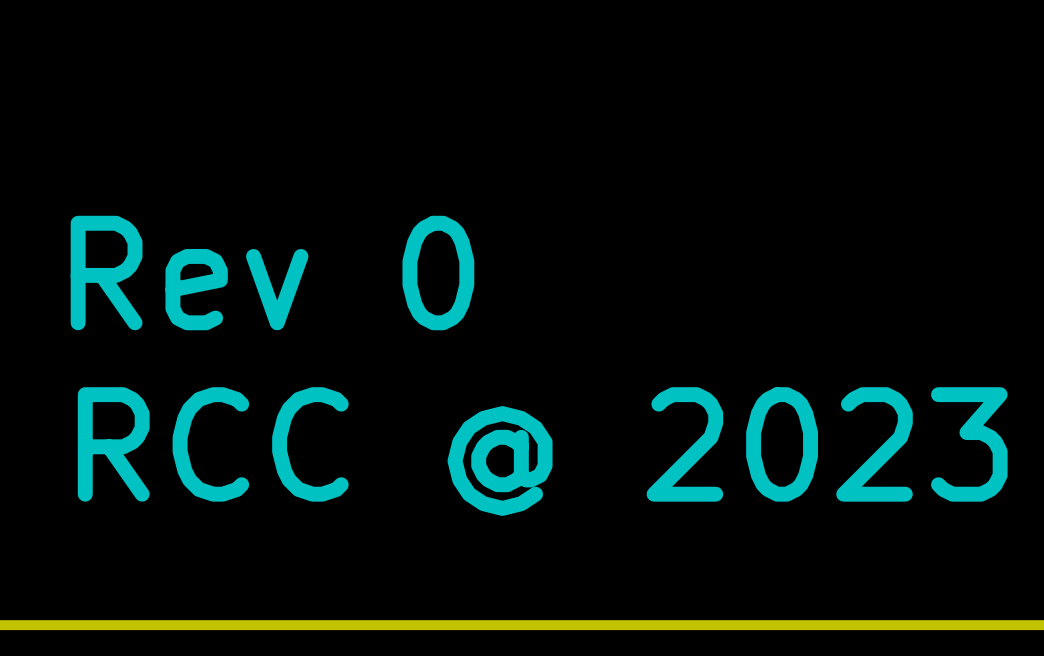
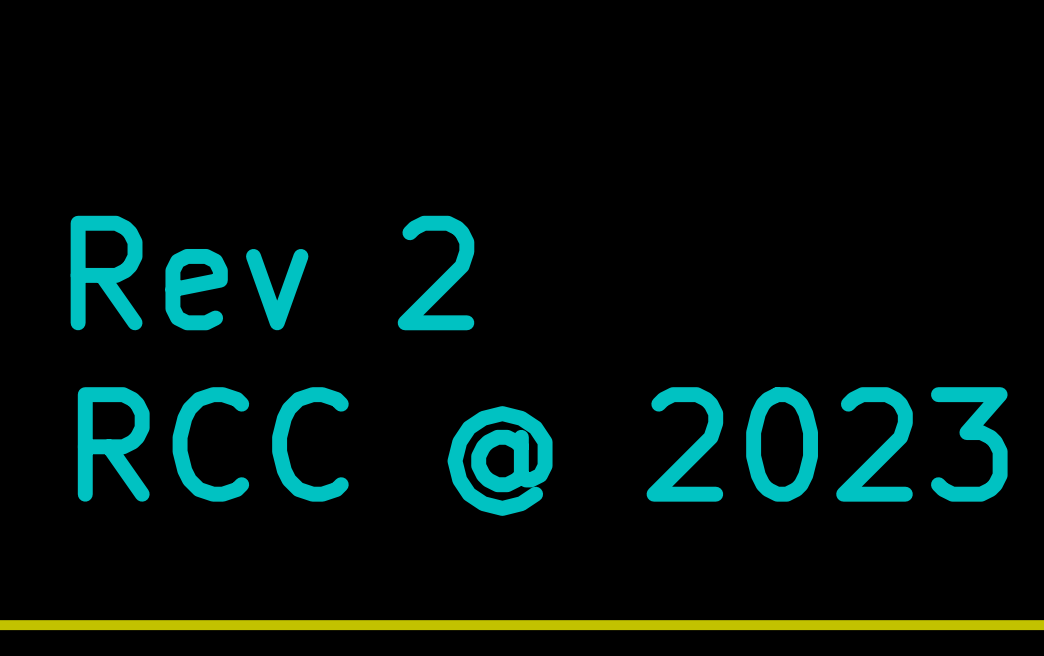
text: Rev 0 (272, 273) -> Rev 2 (272, 273)

